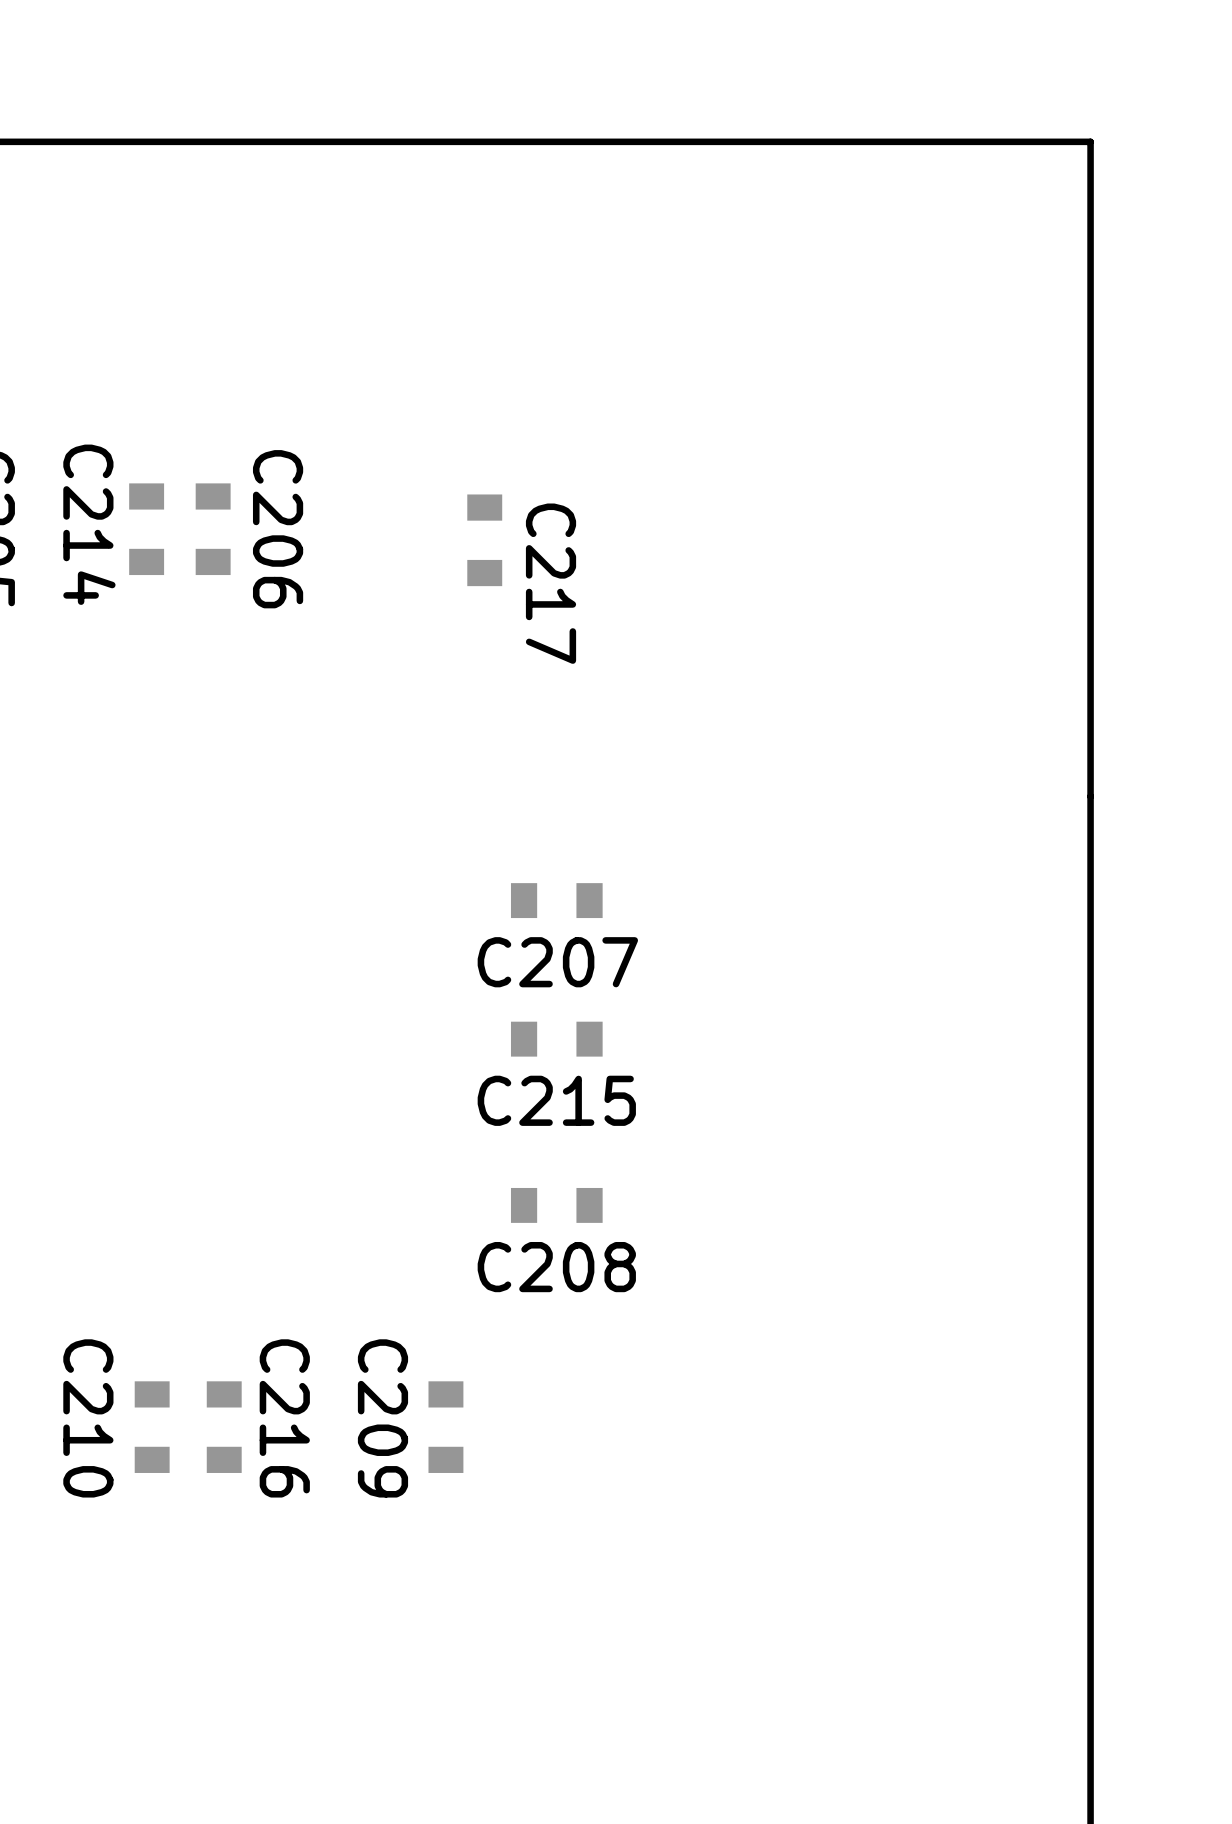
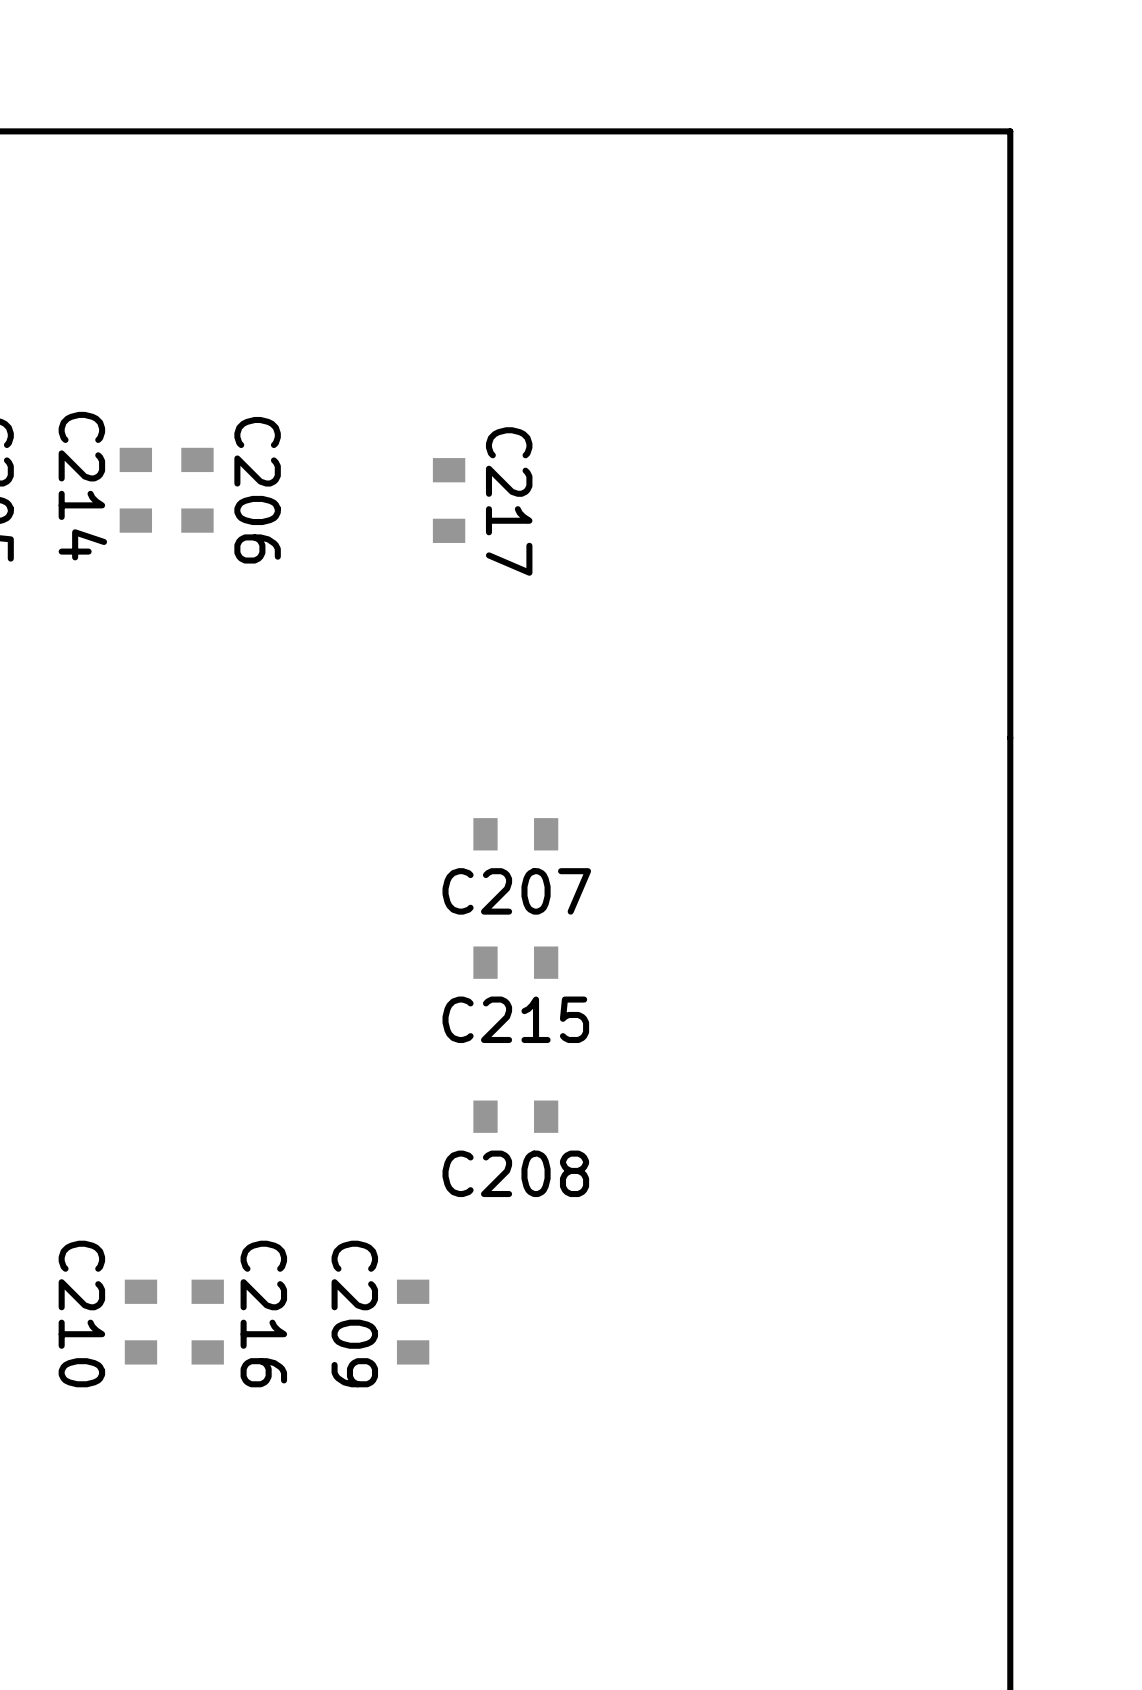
C217 name position: C217 (551, 583) -> C217 (509, 501)

